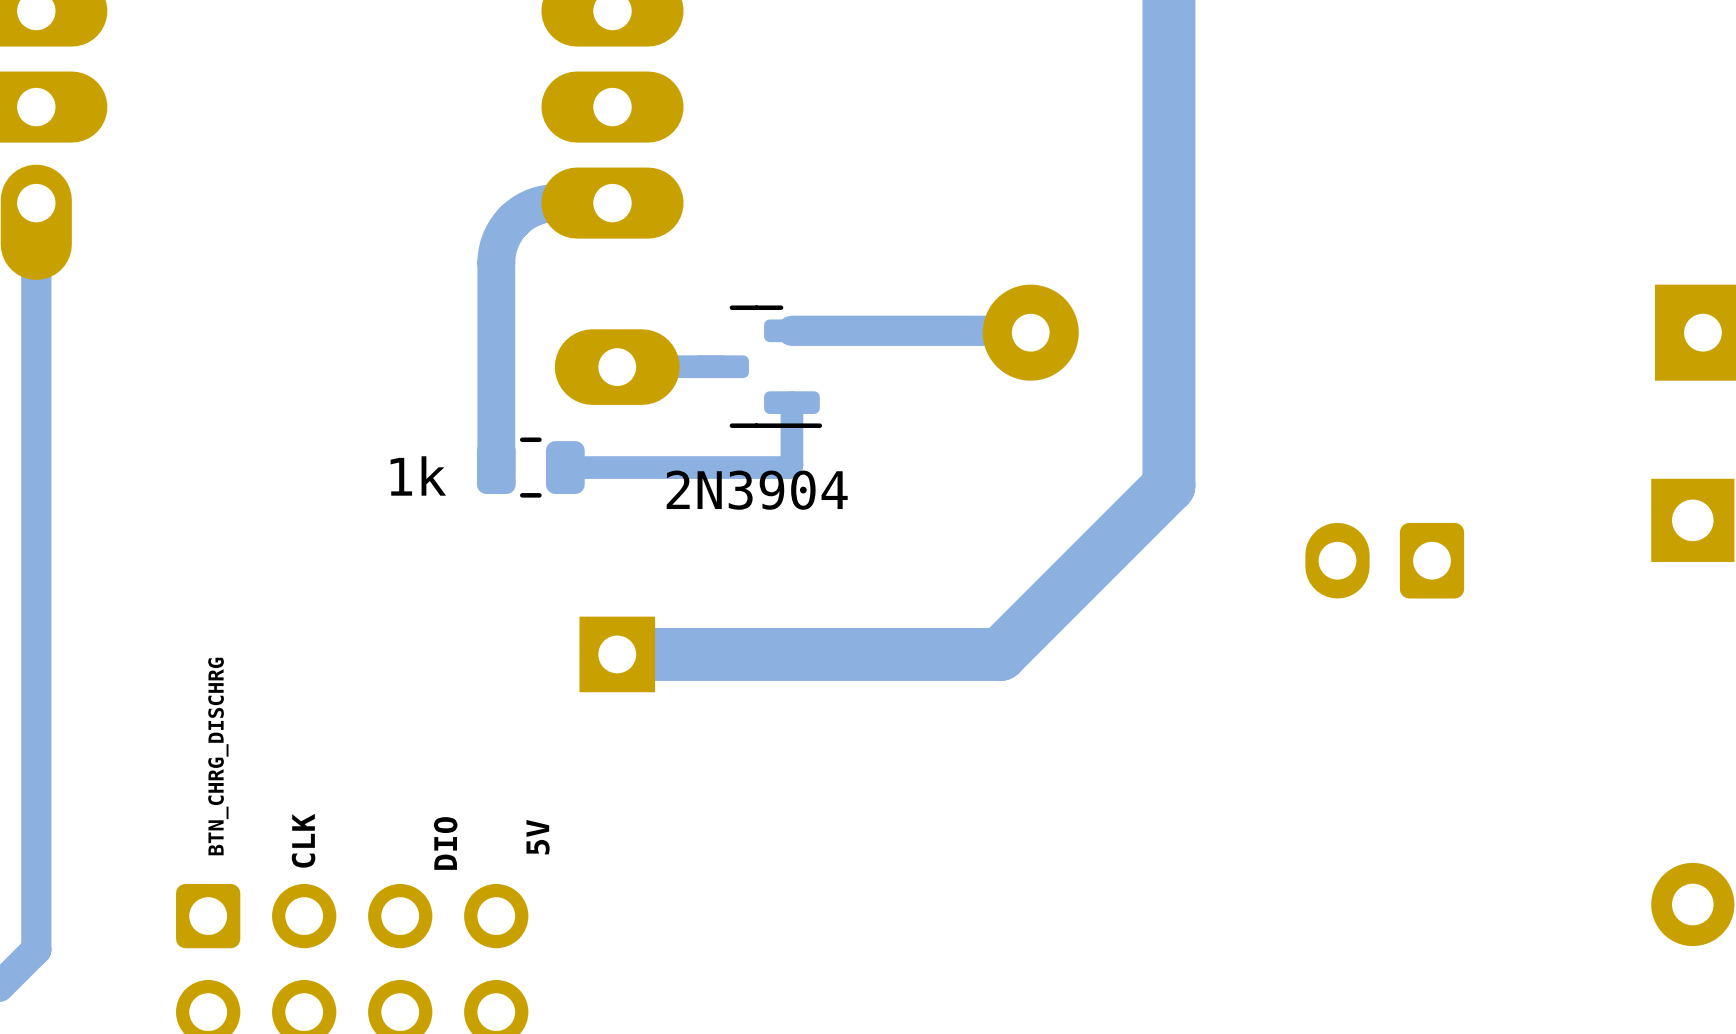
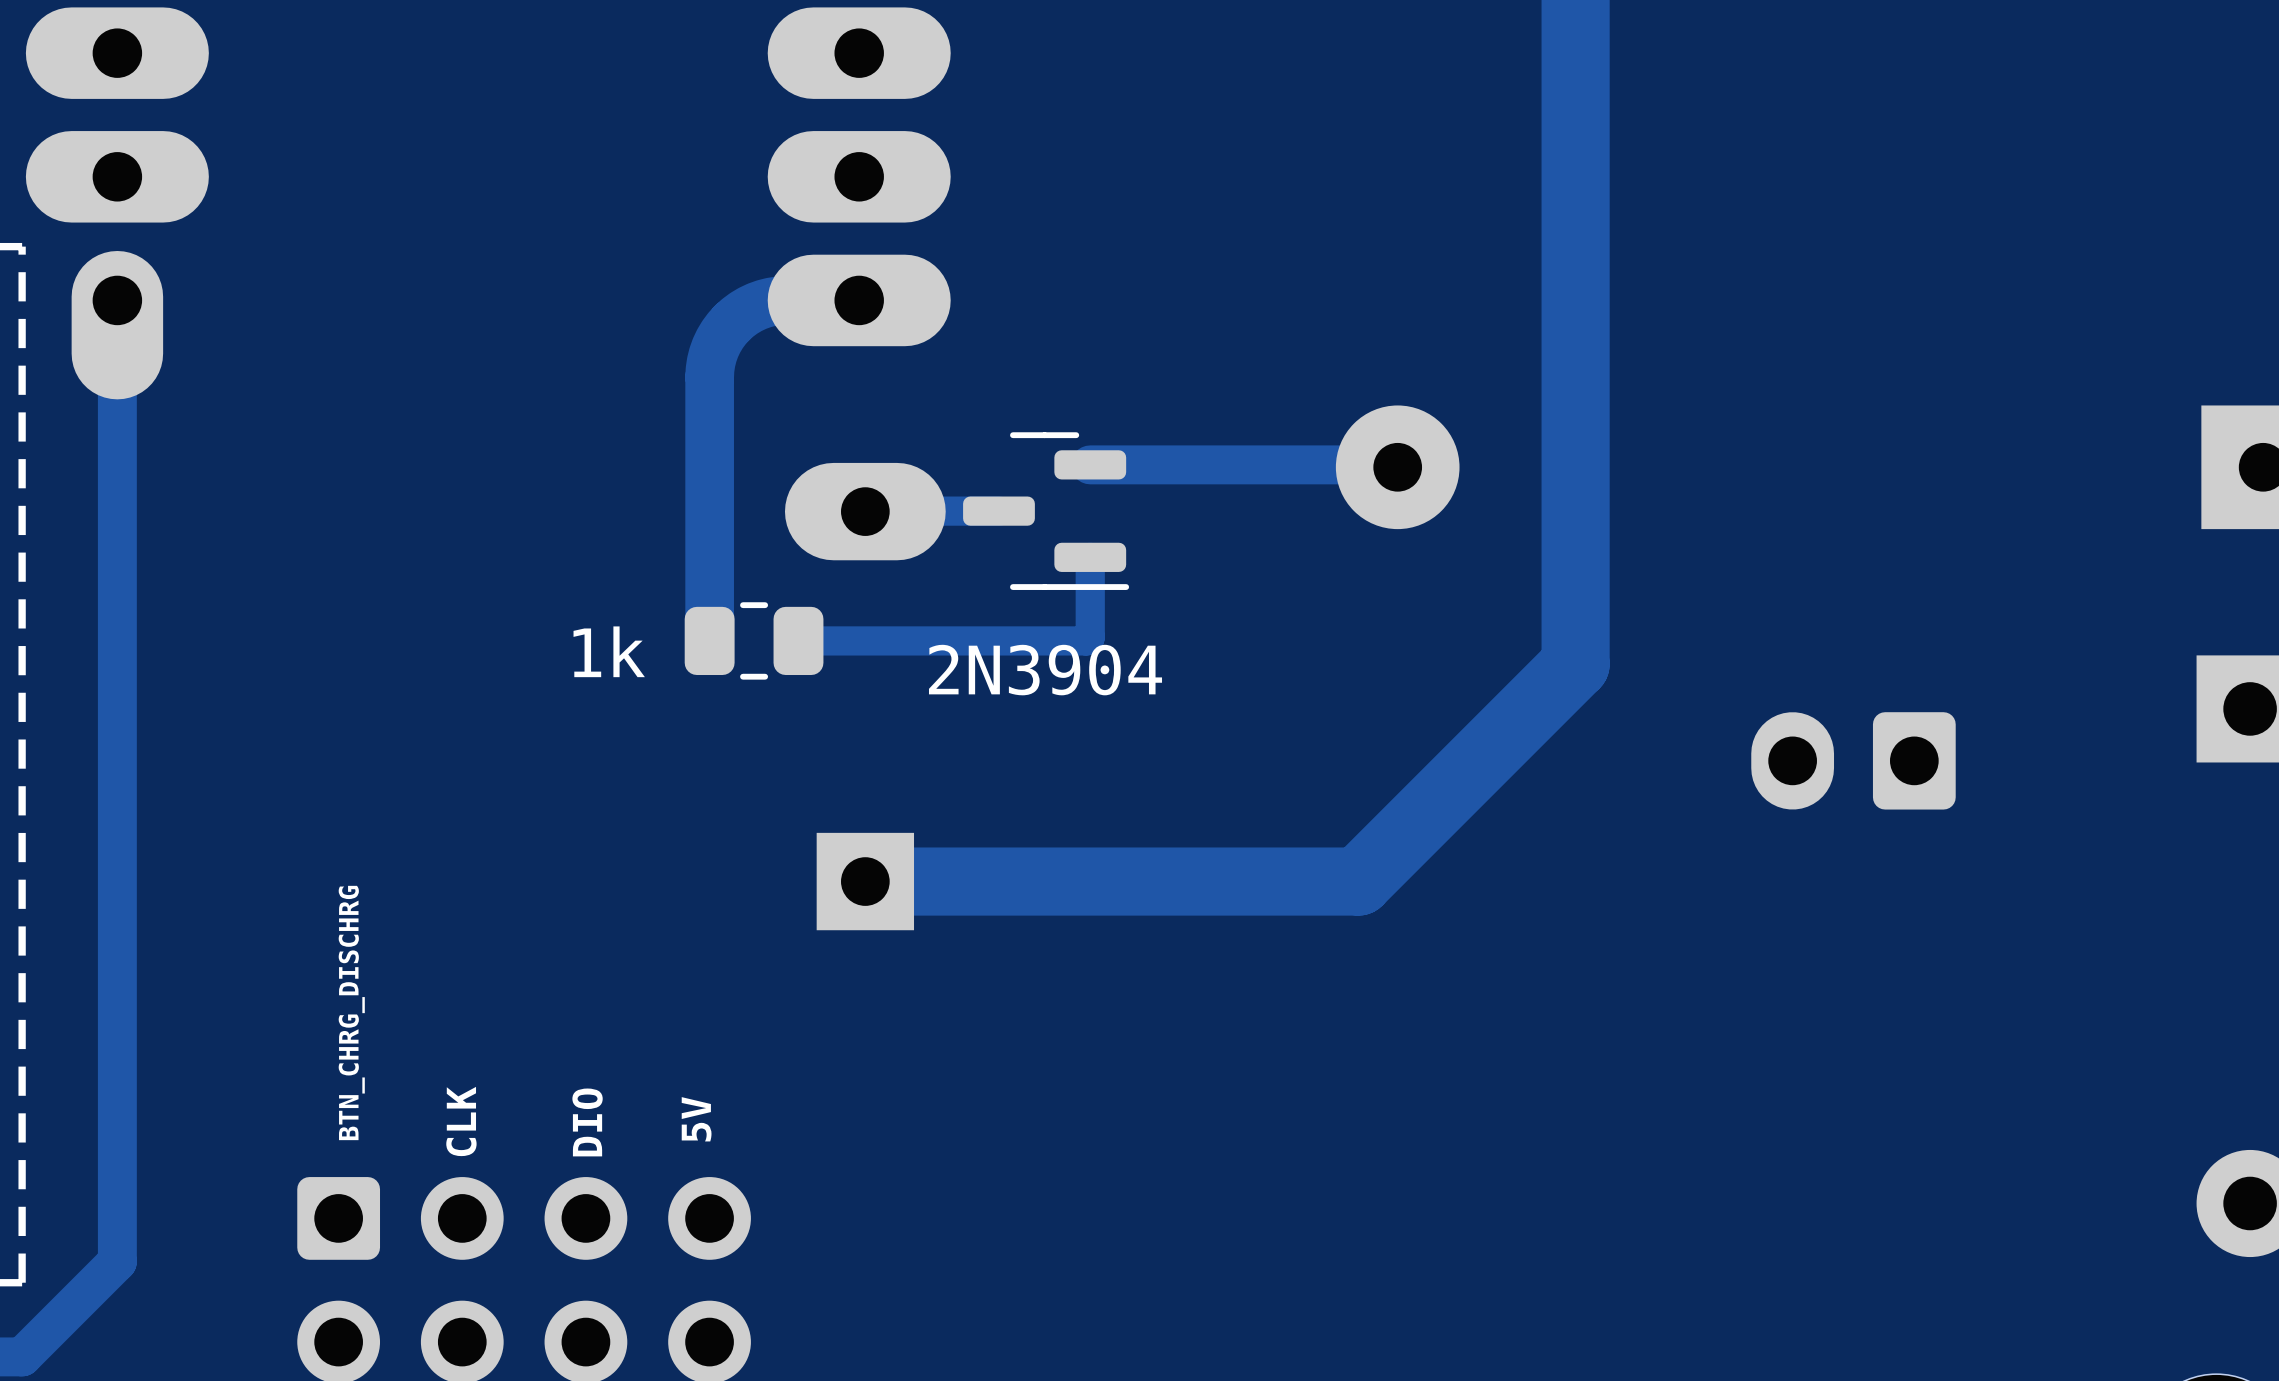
text position: 5V (538, 837) -> 5V (696, 1119)
text position: DIO (445, 843) -> DIO (587, 1122)

